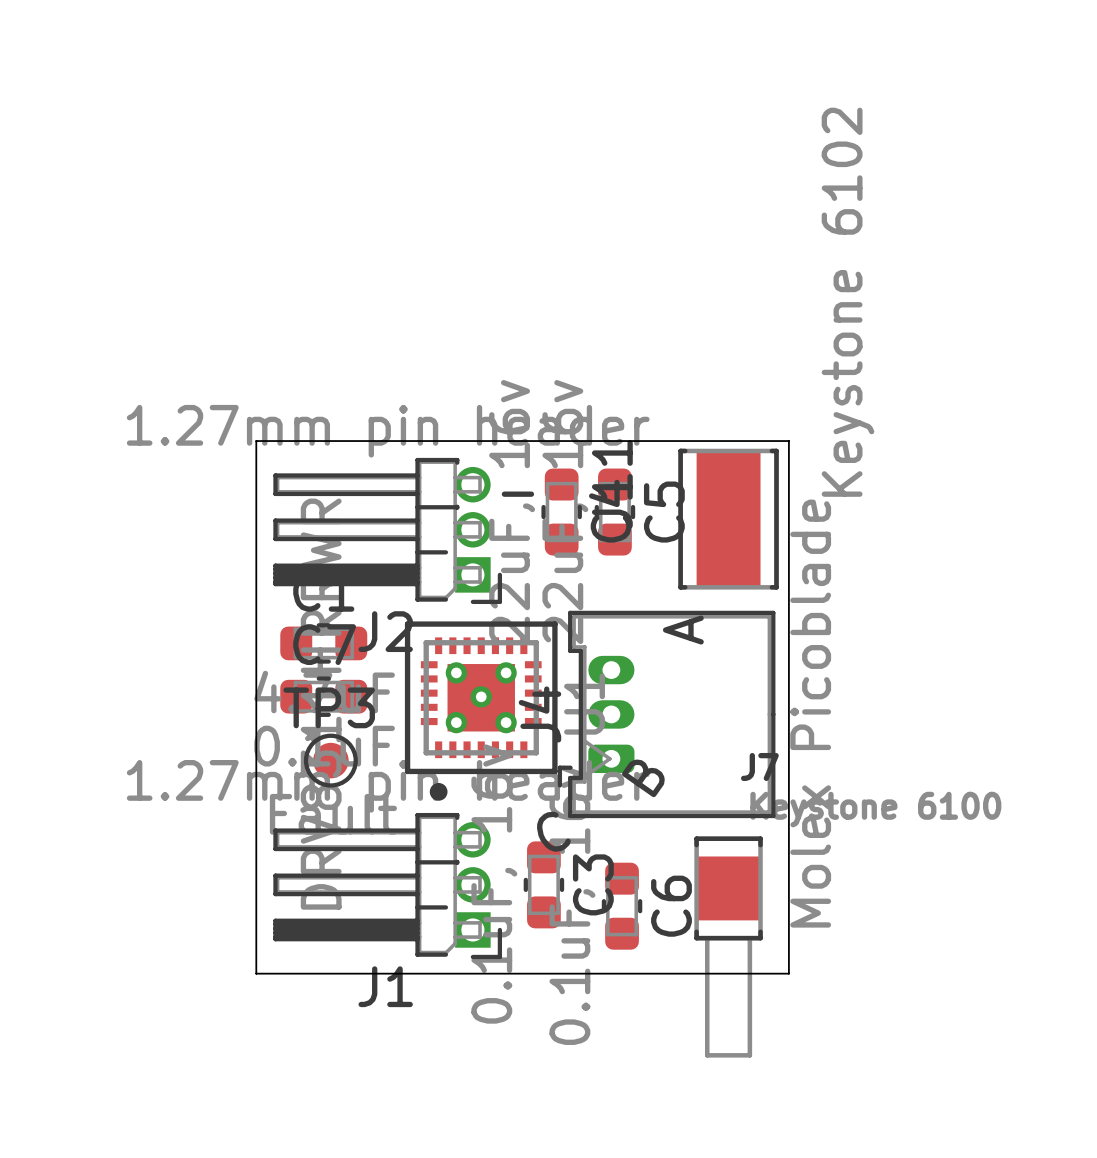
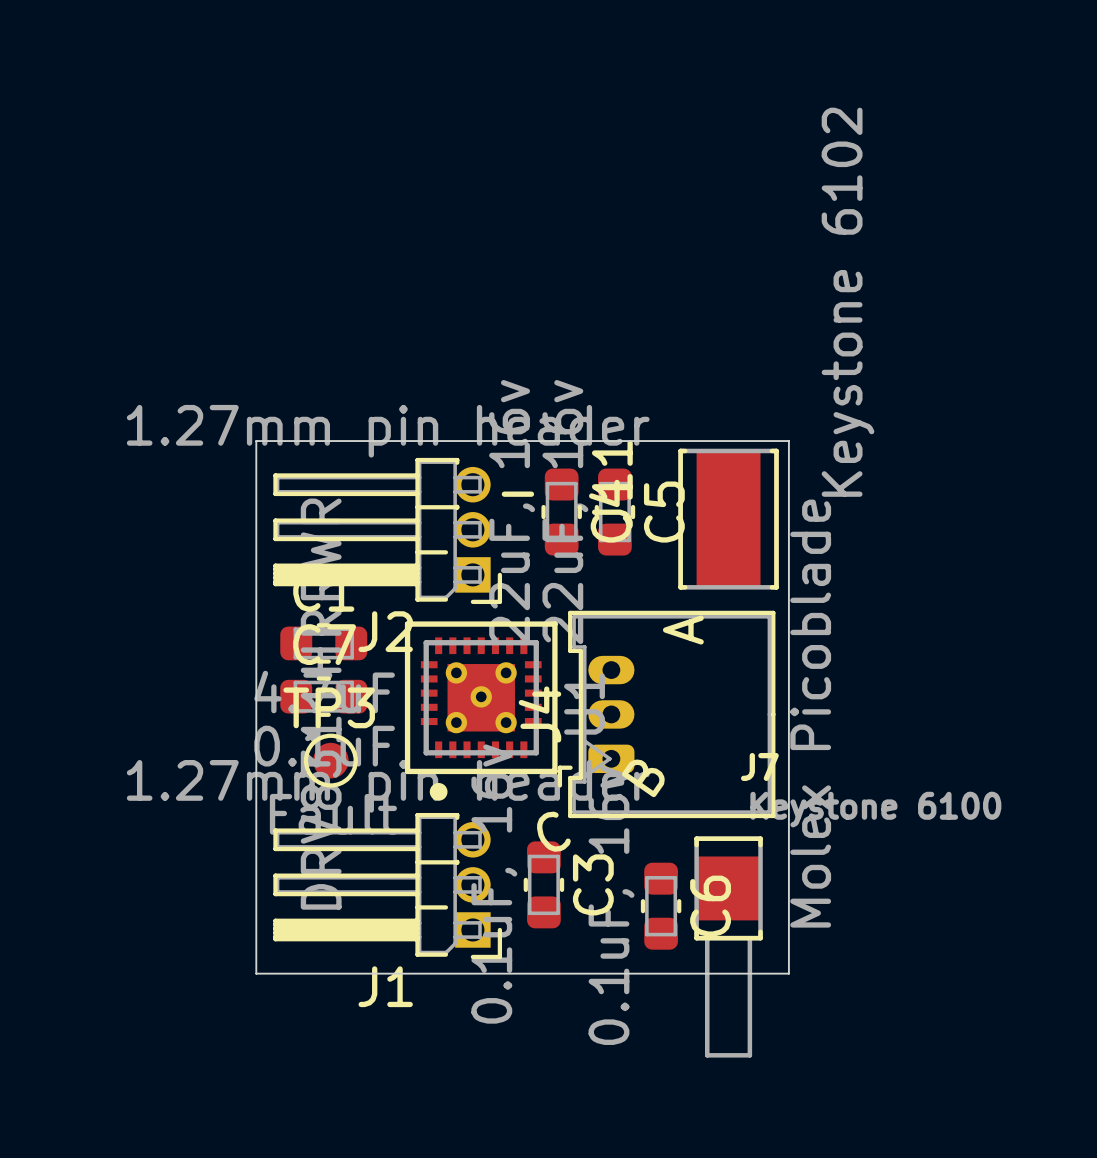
C6 position: (622, 906) -> (661, 906)

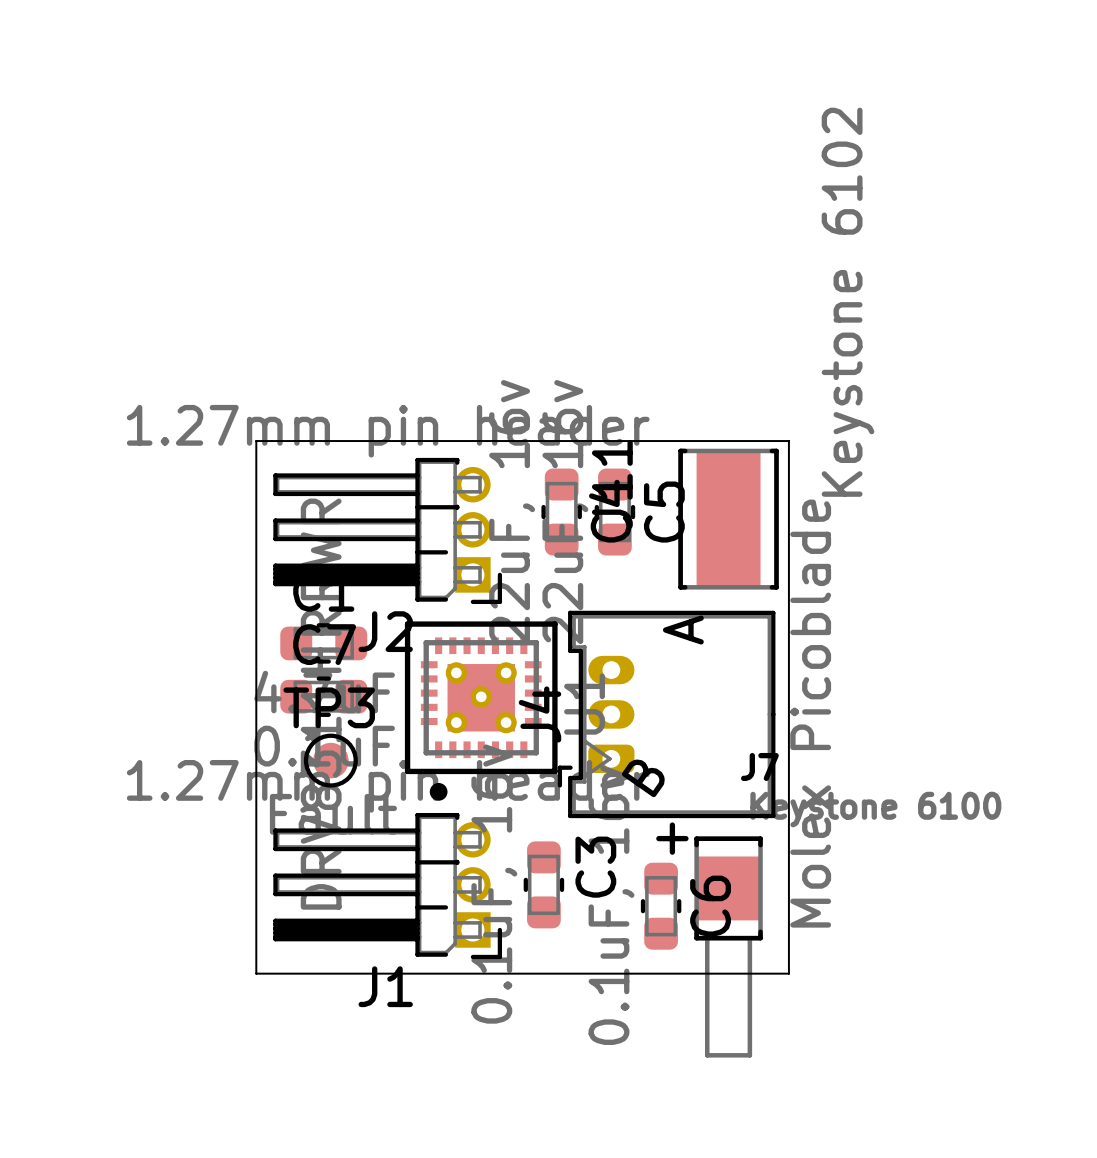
text: - (517, 494) -> none
text: C (553, 831) -> none
text: none -> + (672, 838)
C3 name position: C3 (593, 884) -> C3 (595, 867)

